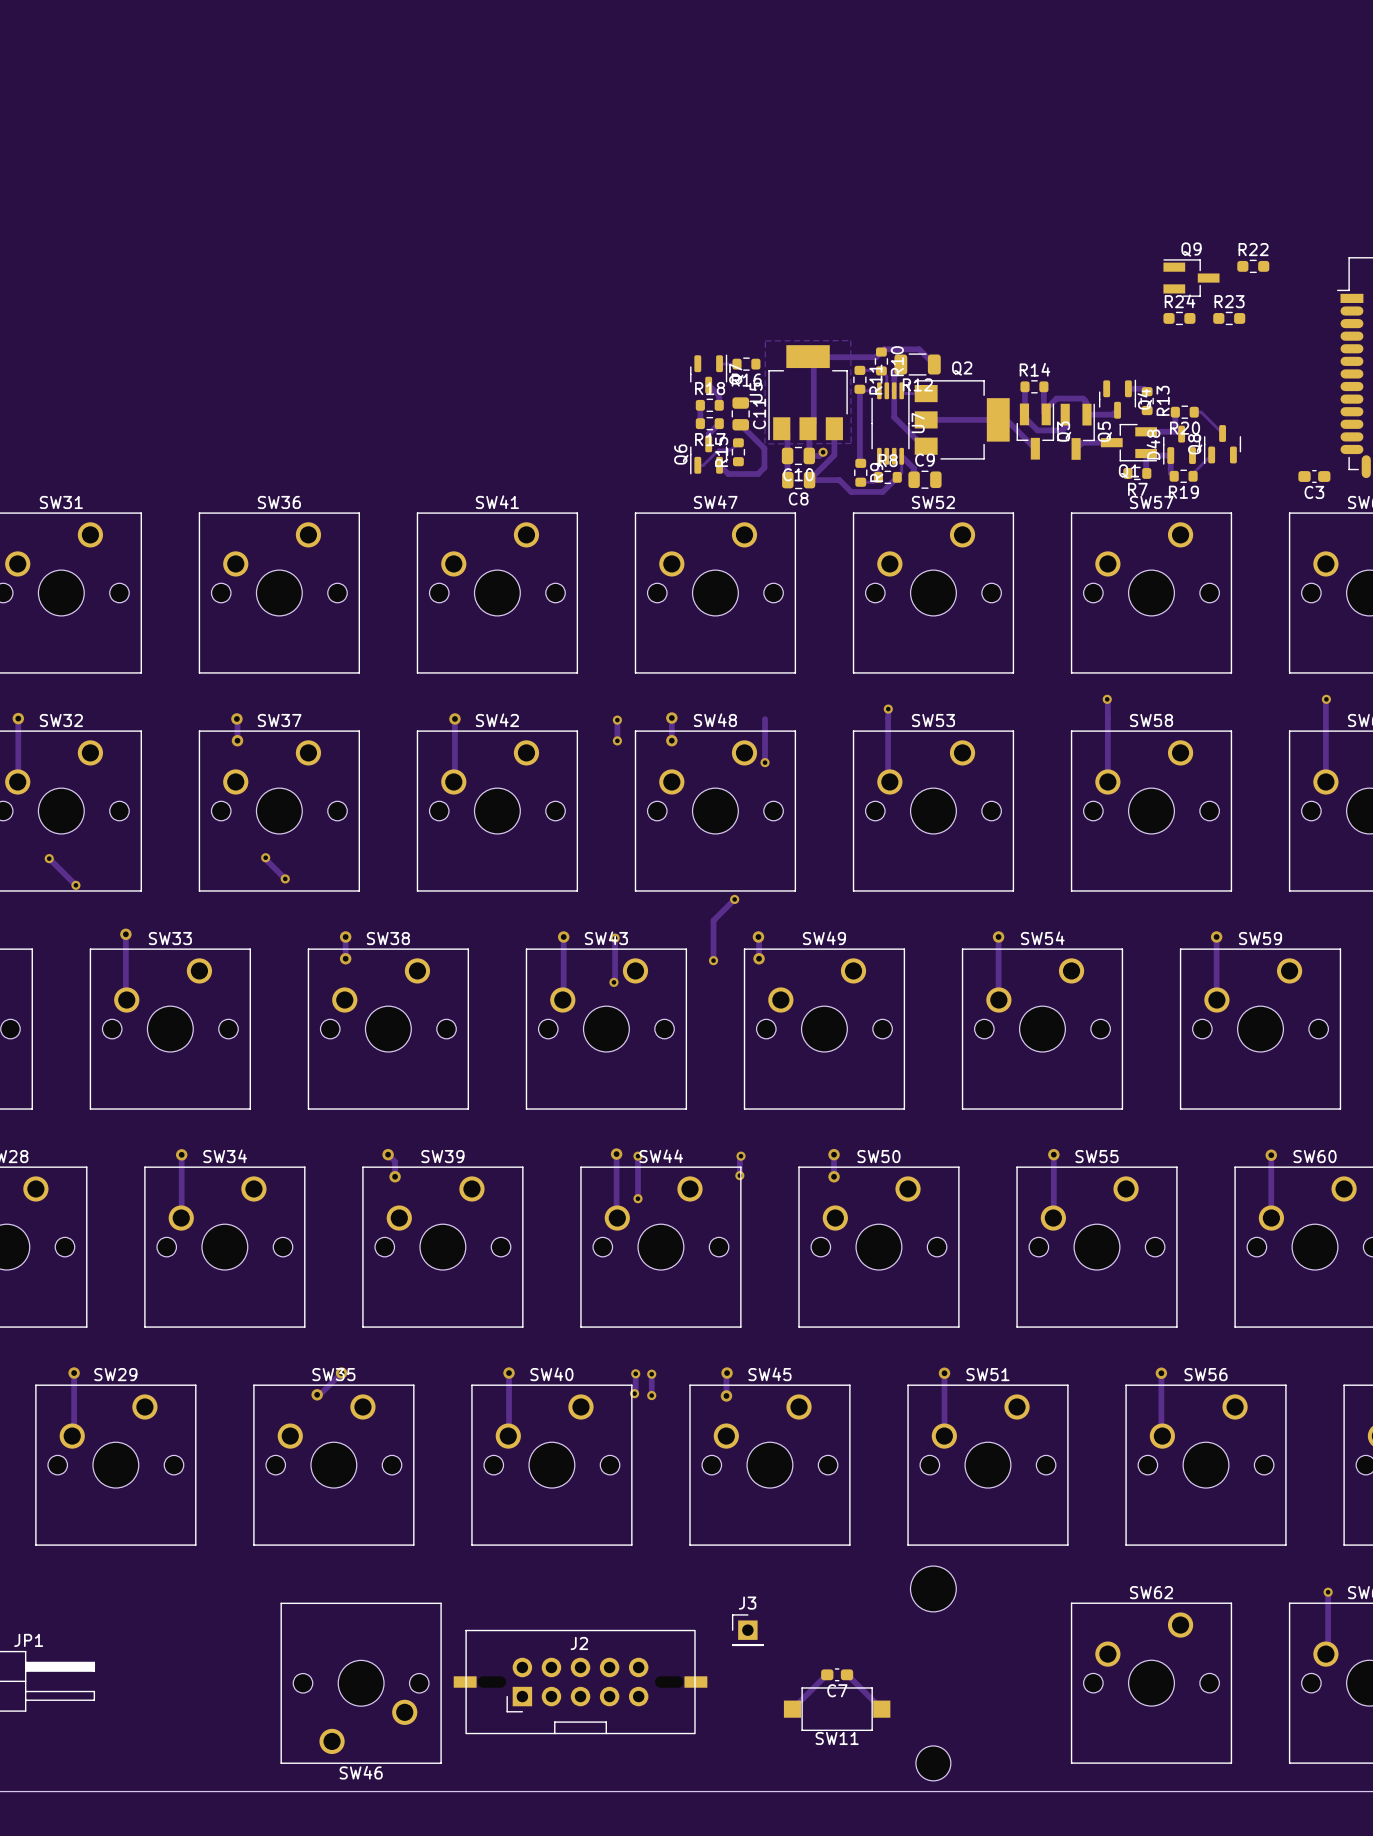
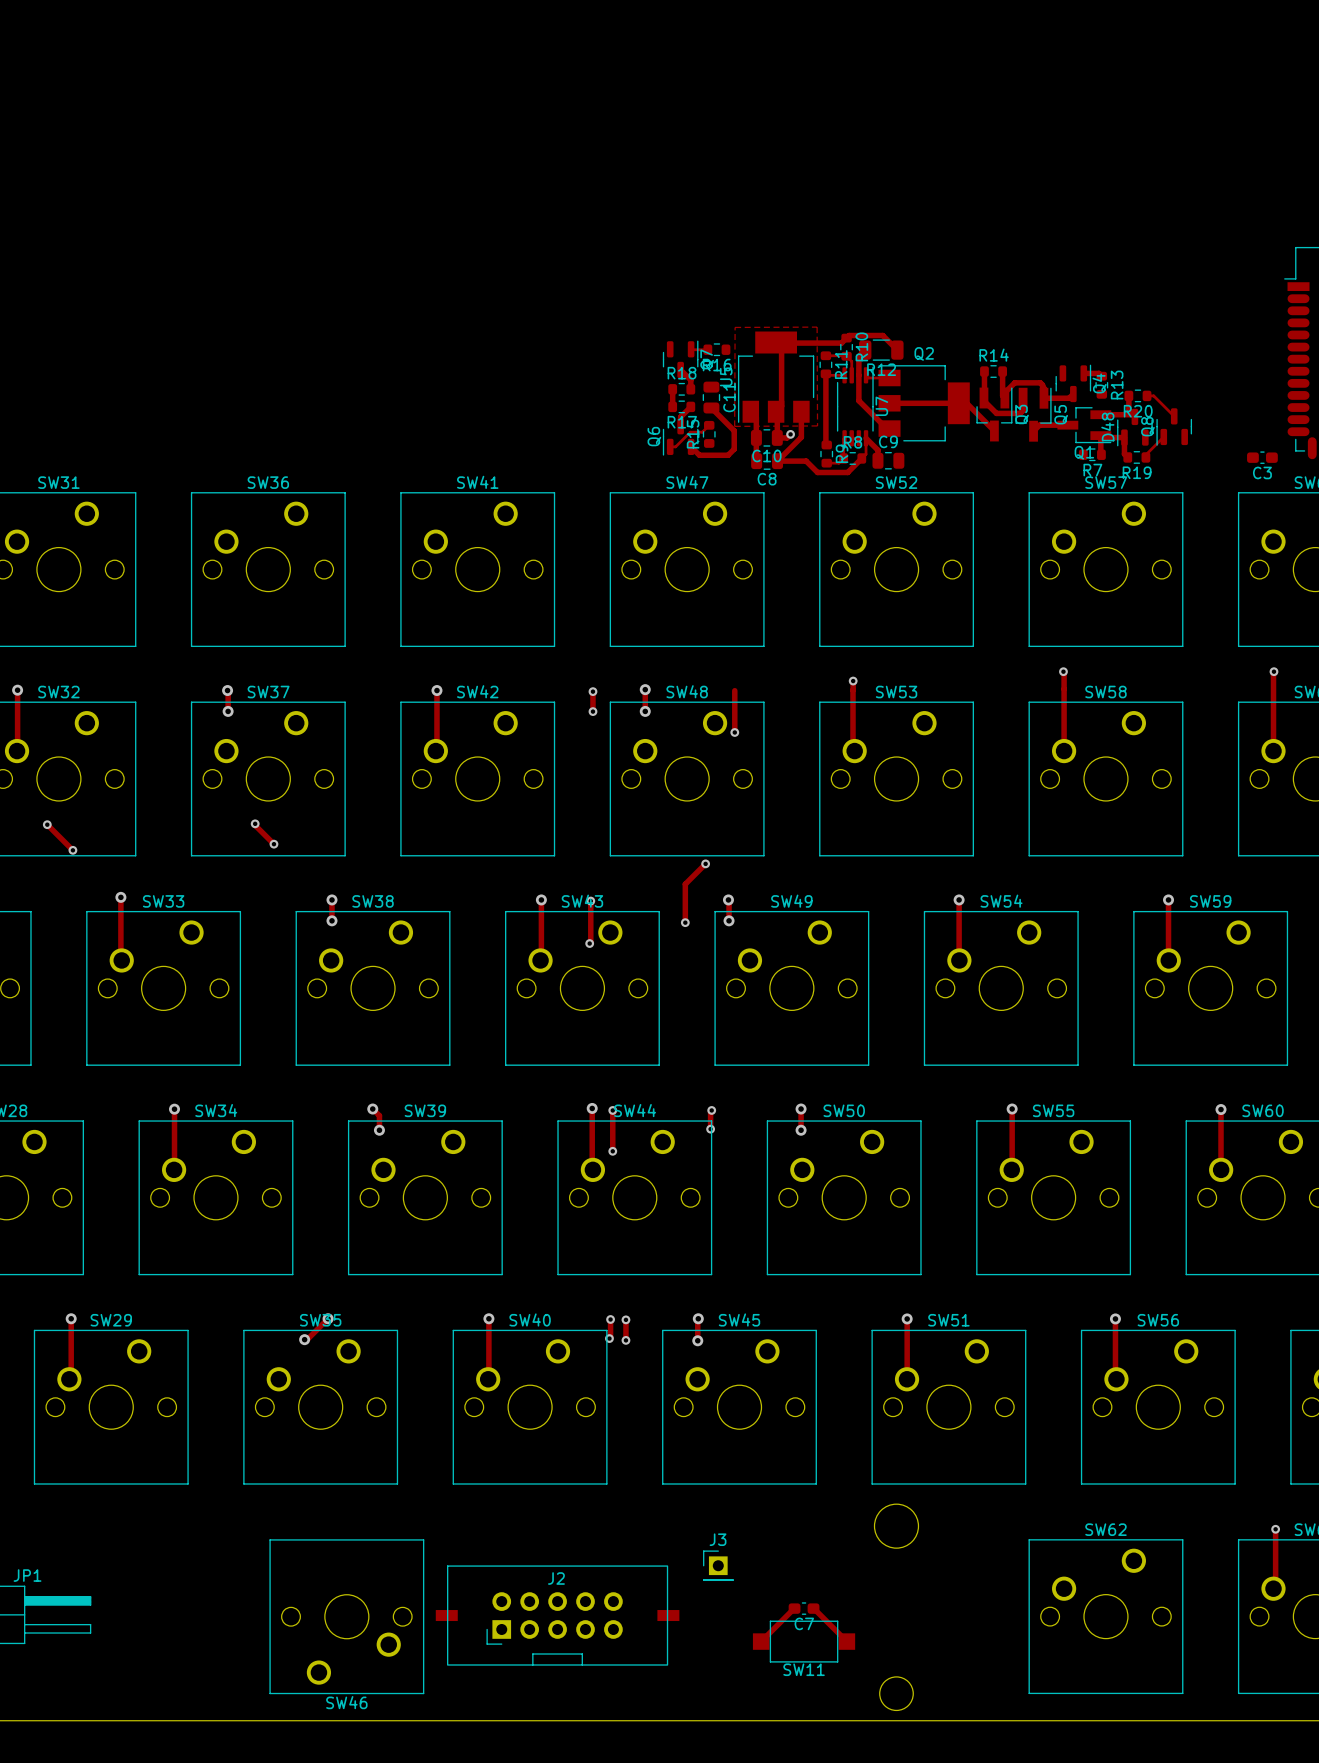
R22: (1253, 266) -> none
Q9: (1191, 278) -> none
R24: (1179, 318) -> none
R23: (1229, 318) -> none

